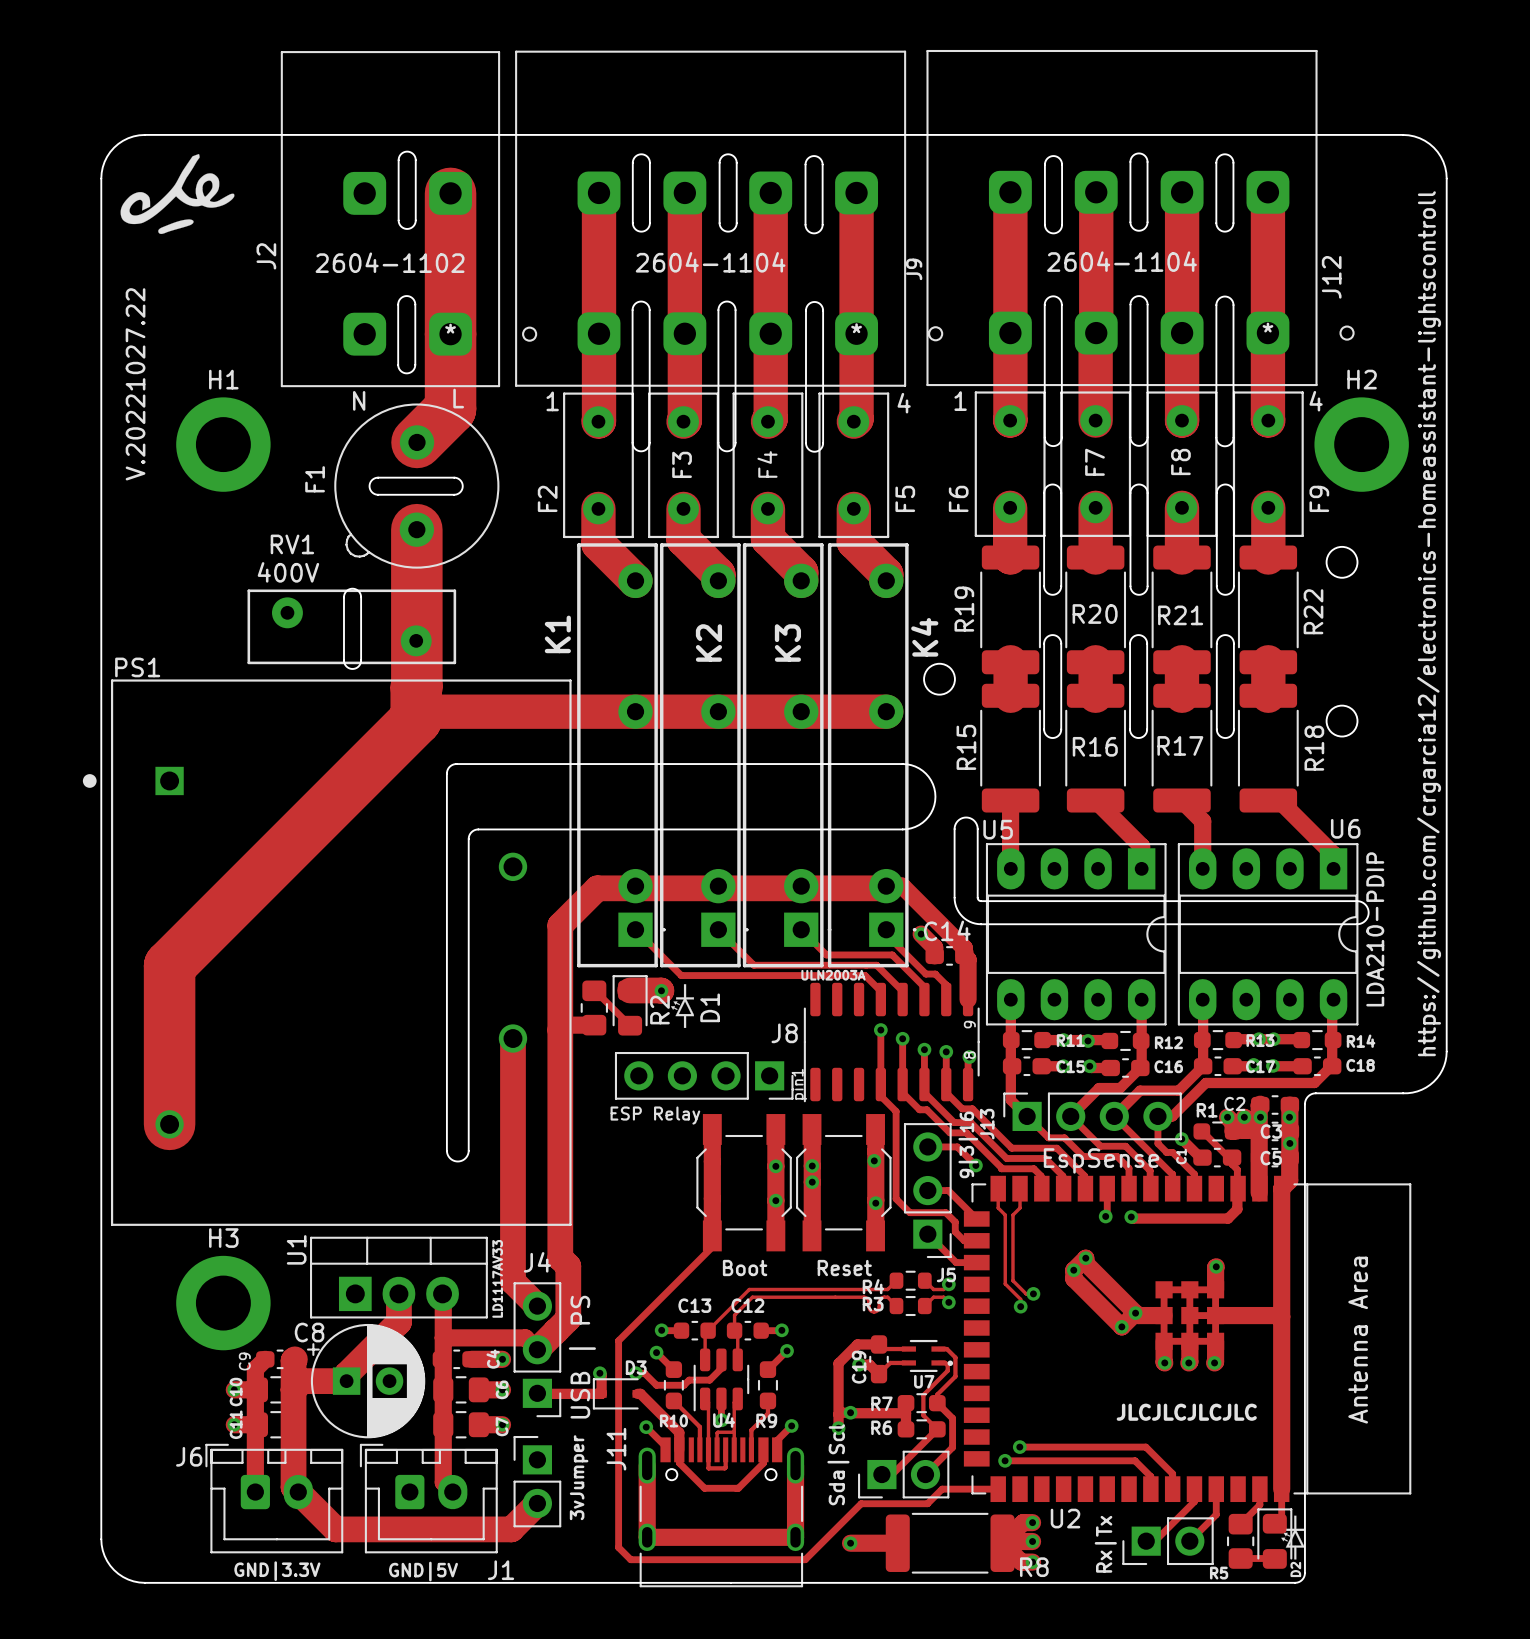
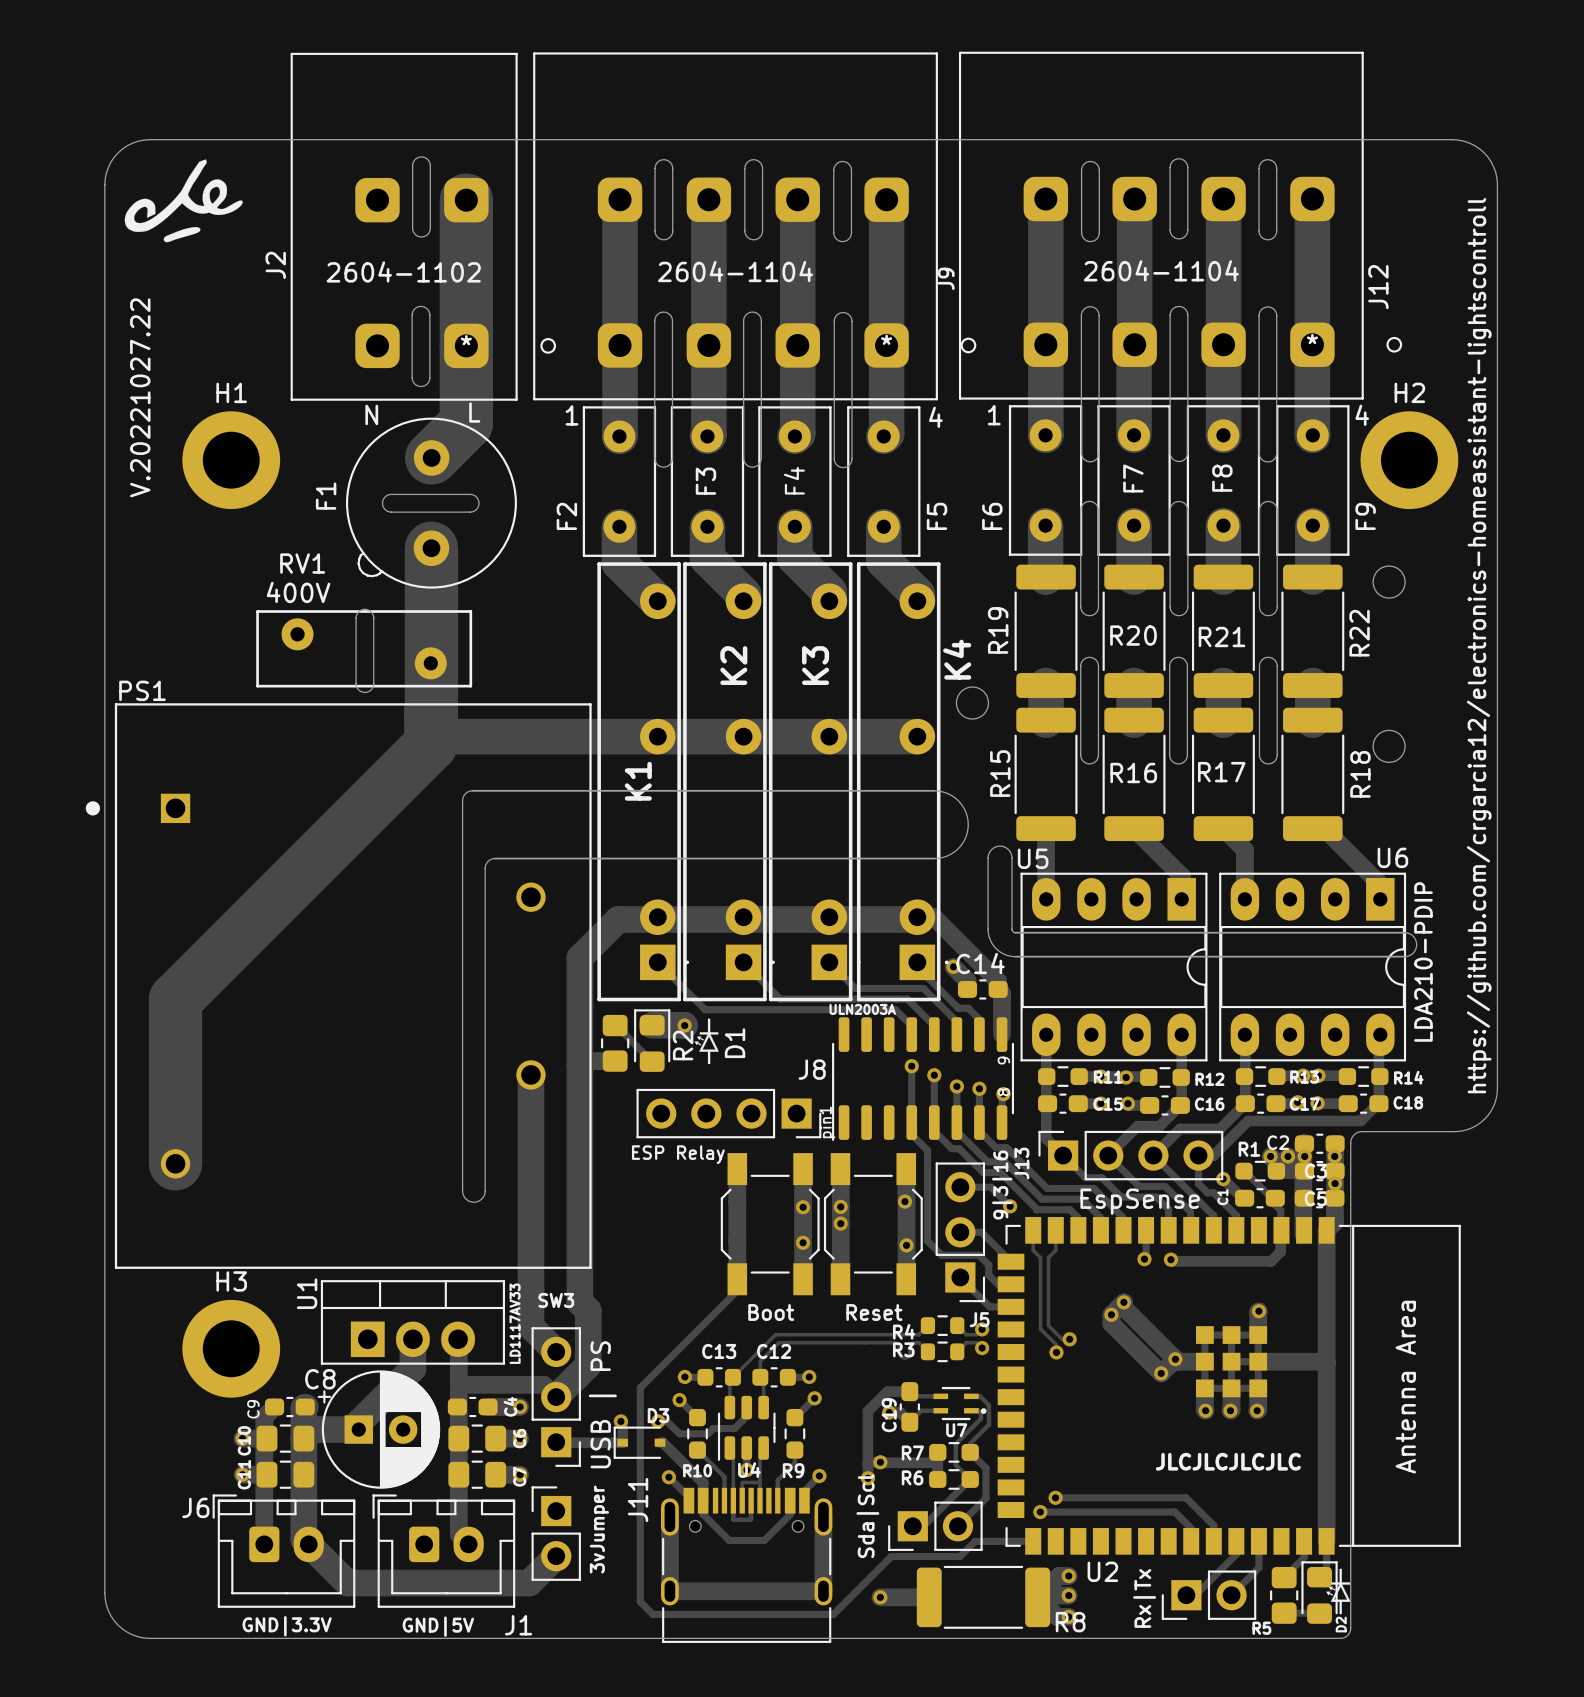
K1 name position: K1 (557, 634) -> K1 (638, 781)
J4 name: J4 (537, 1262) -> SW3 (556, 1300)

